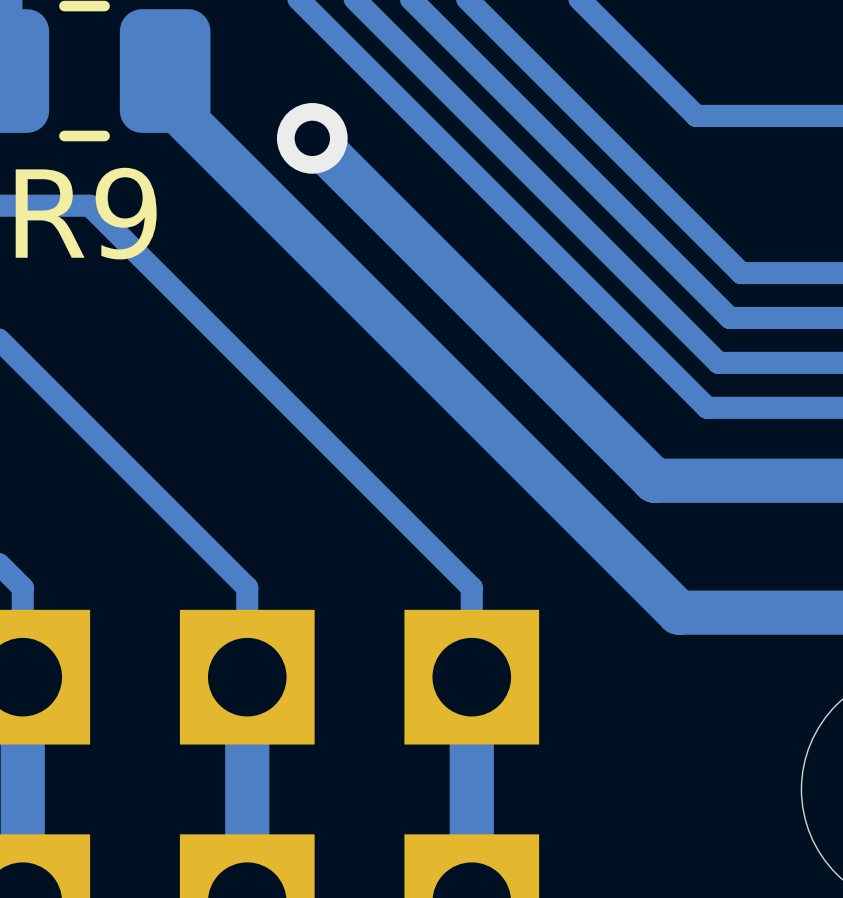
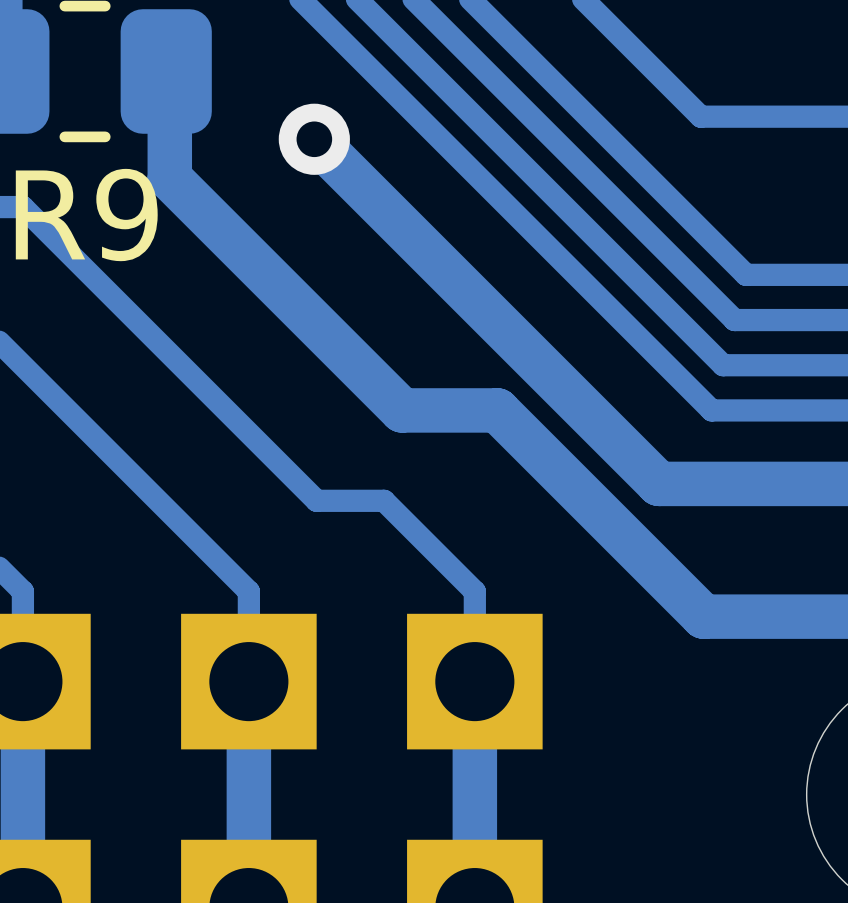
track: (168, 102) (678, 612) (699, 612) -> (169, 103) (169, 178) (402, 410) (497, 410) (703, 616)
track: (22, 205) (89, 205) (381, 497) -> (22, 207) (316, 500) (384, 500)

